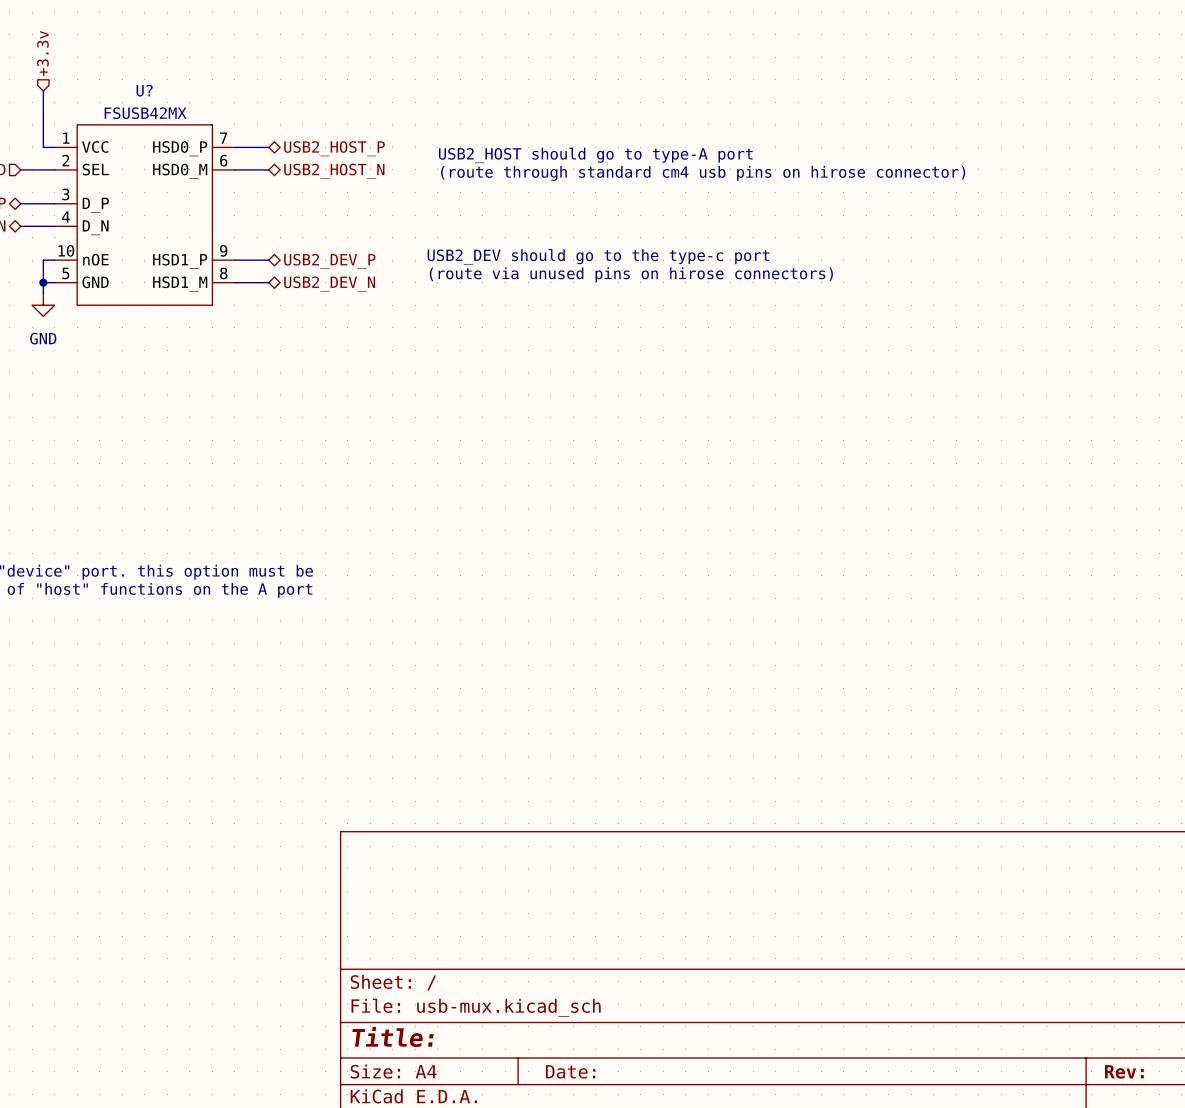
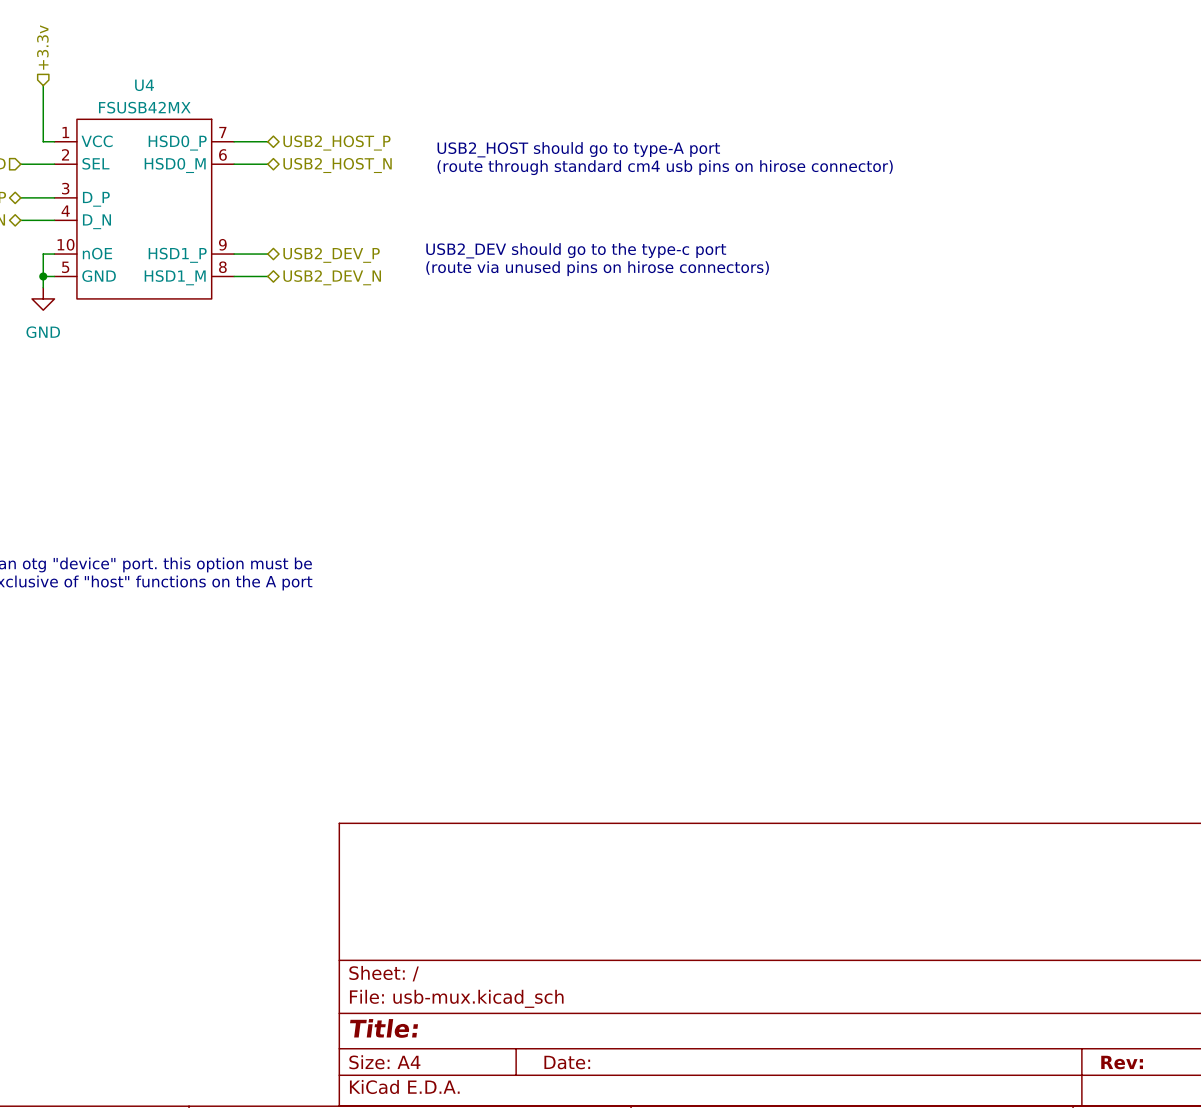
U? name: U? (144, 90) -> U4 (144, 85)

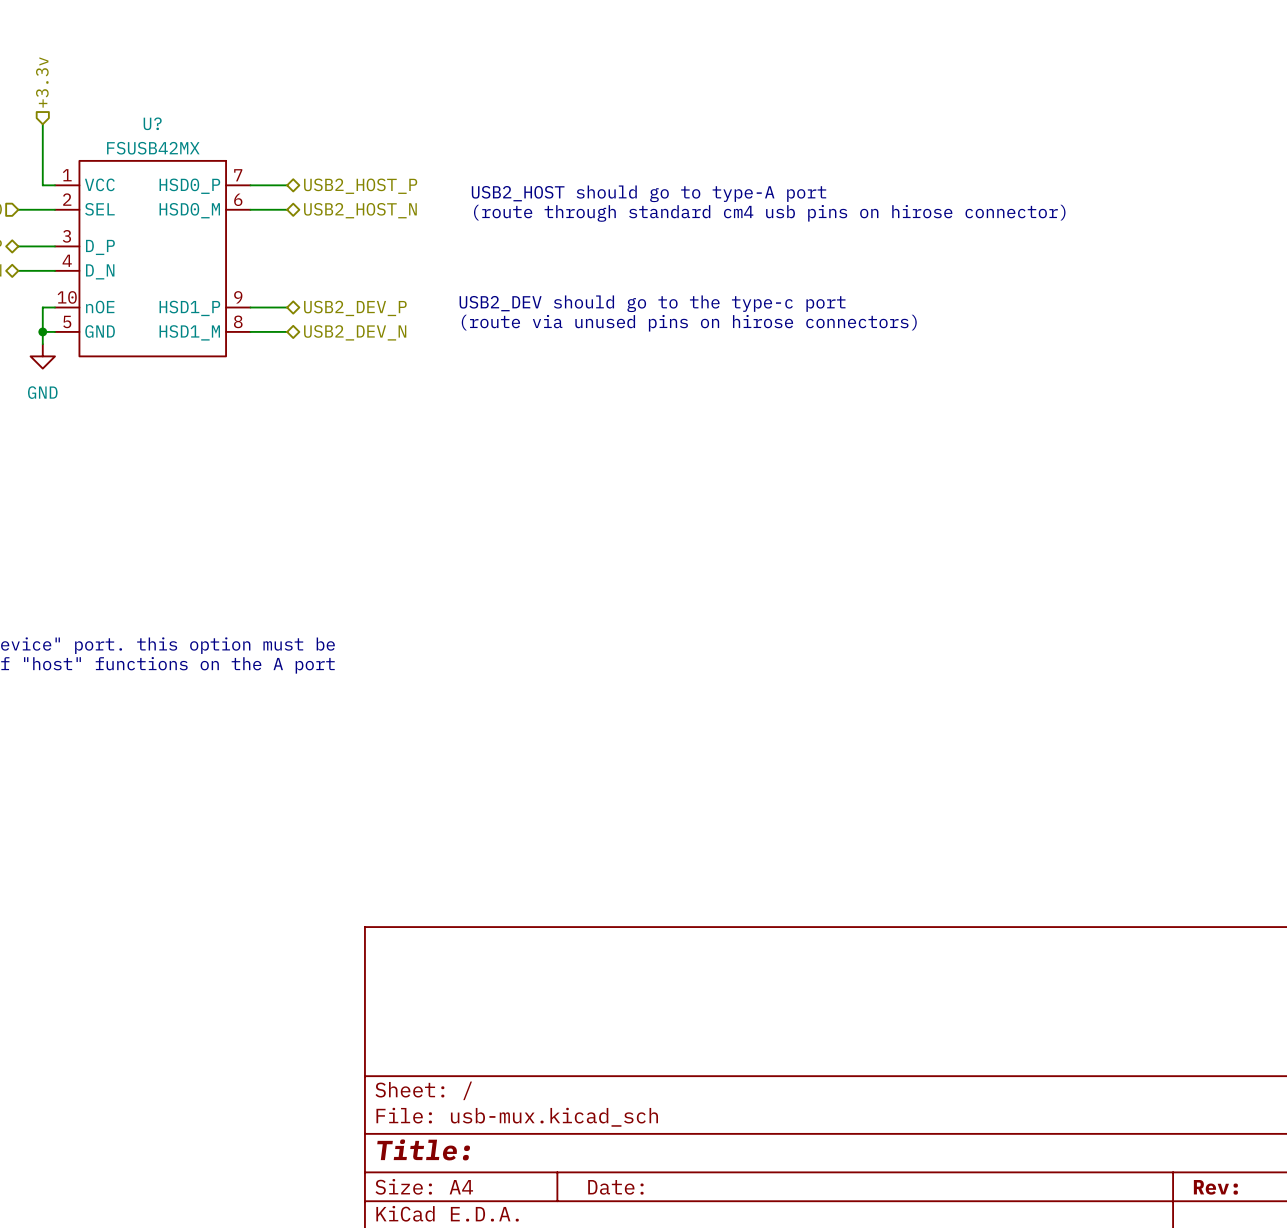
U4 name: U4 (144, 85) -> U? (152, 123)

